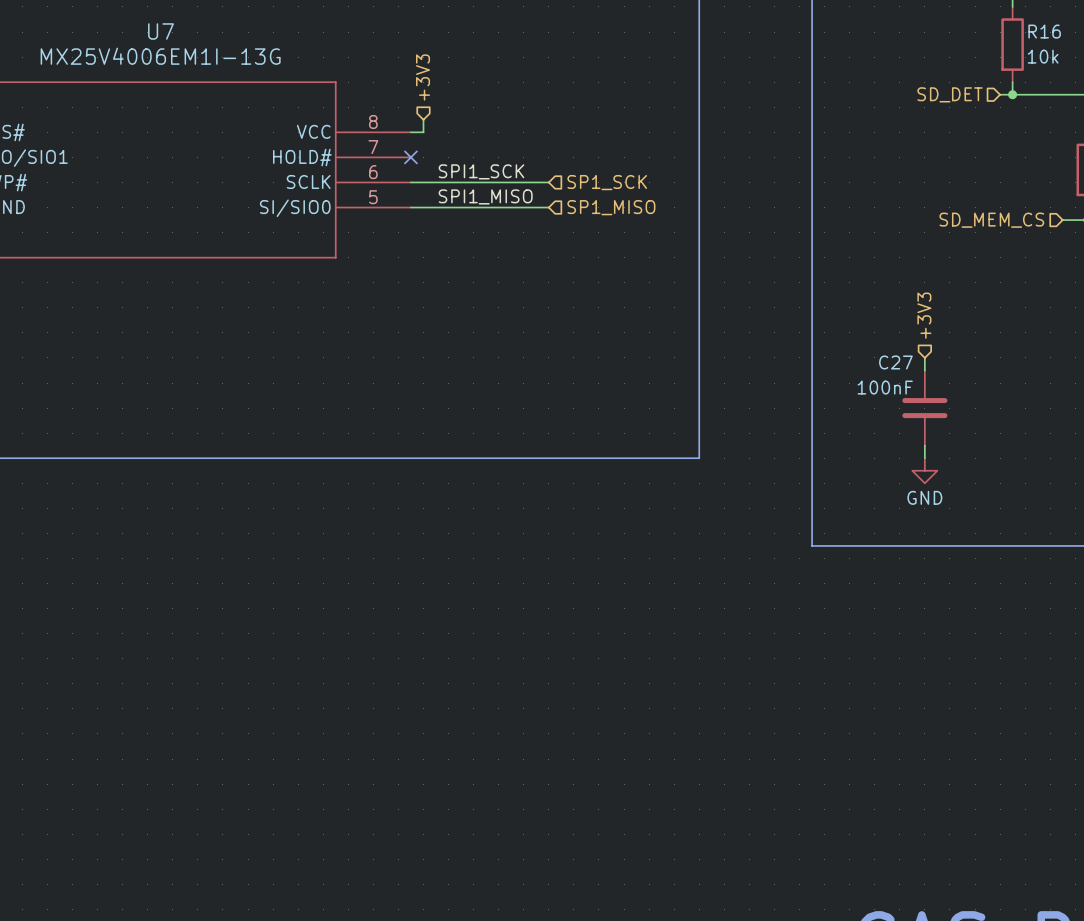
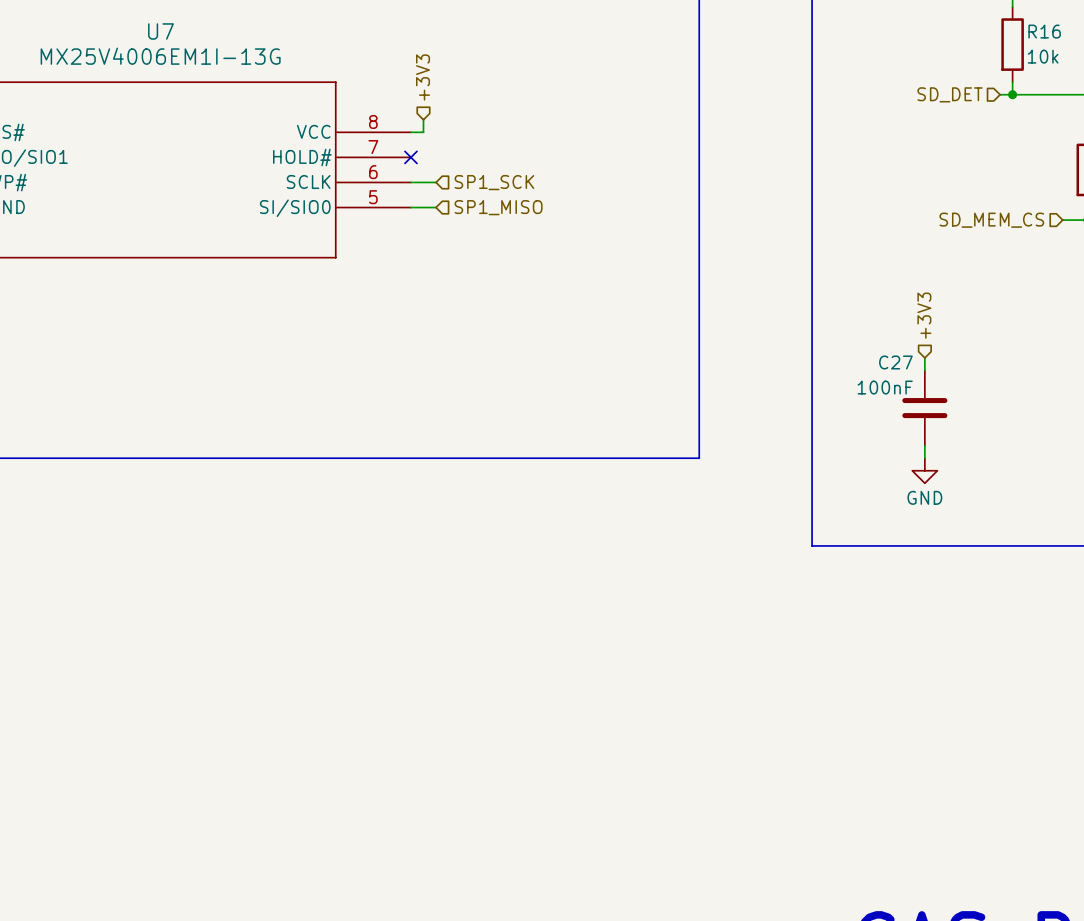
label: SPI1_SCK (481, 171) -> none
wire: (436, 182) (548, 182) -> none
hierarchical label position: SP1_SCK (607, 182) -> SP1_SCK (494, 182)
label: SPI1_MISO (485, 196) -> none
wire: (436, 207) (548, 207) -> none
hierarchical label position: SP1_MISO (611, 207) -> SP1_MISO (498, 207)

